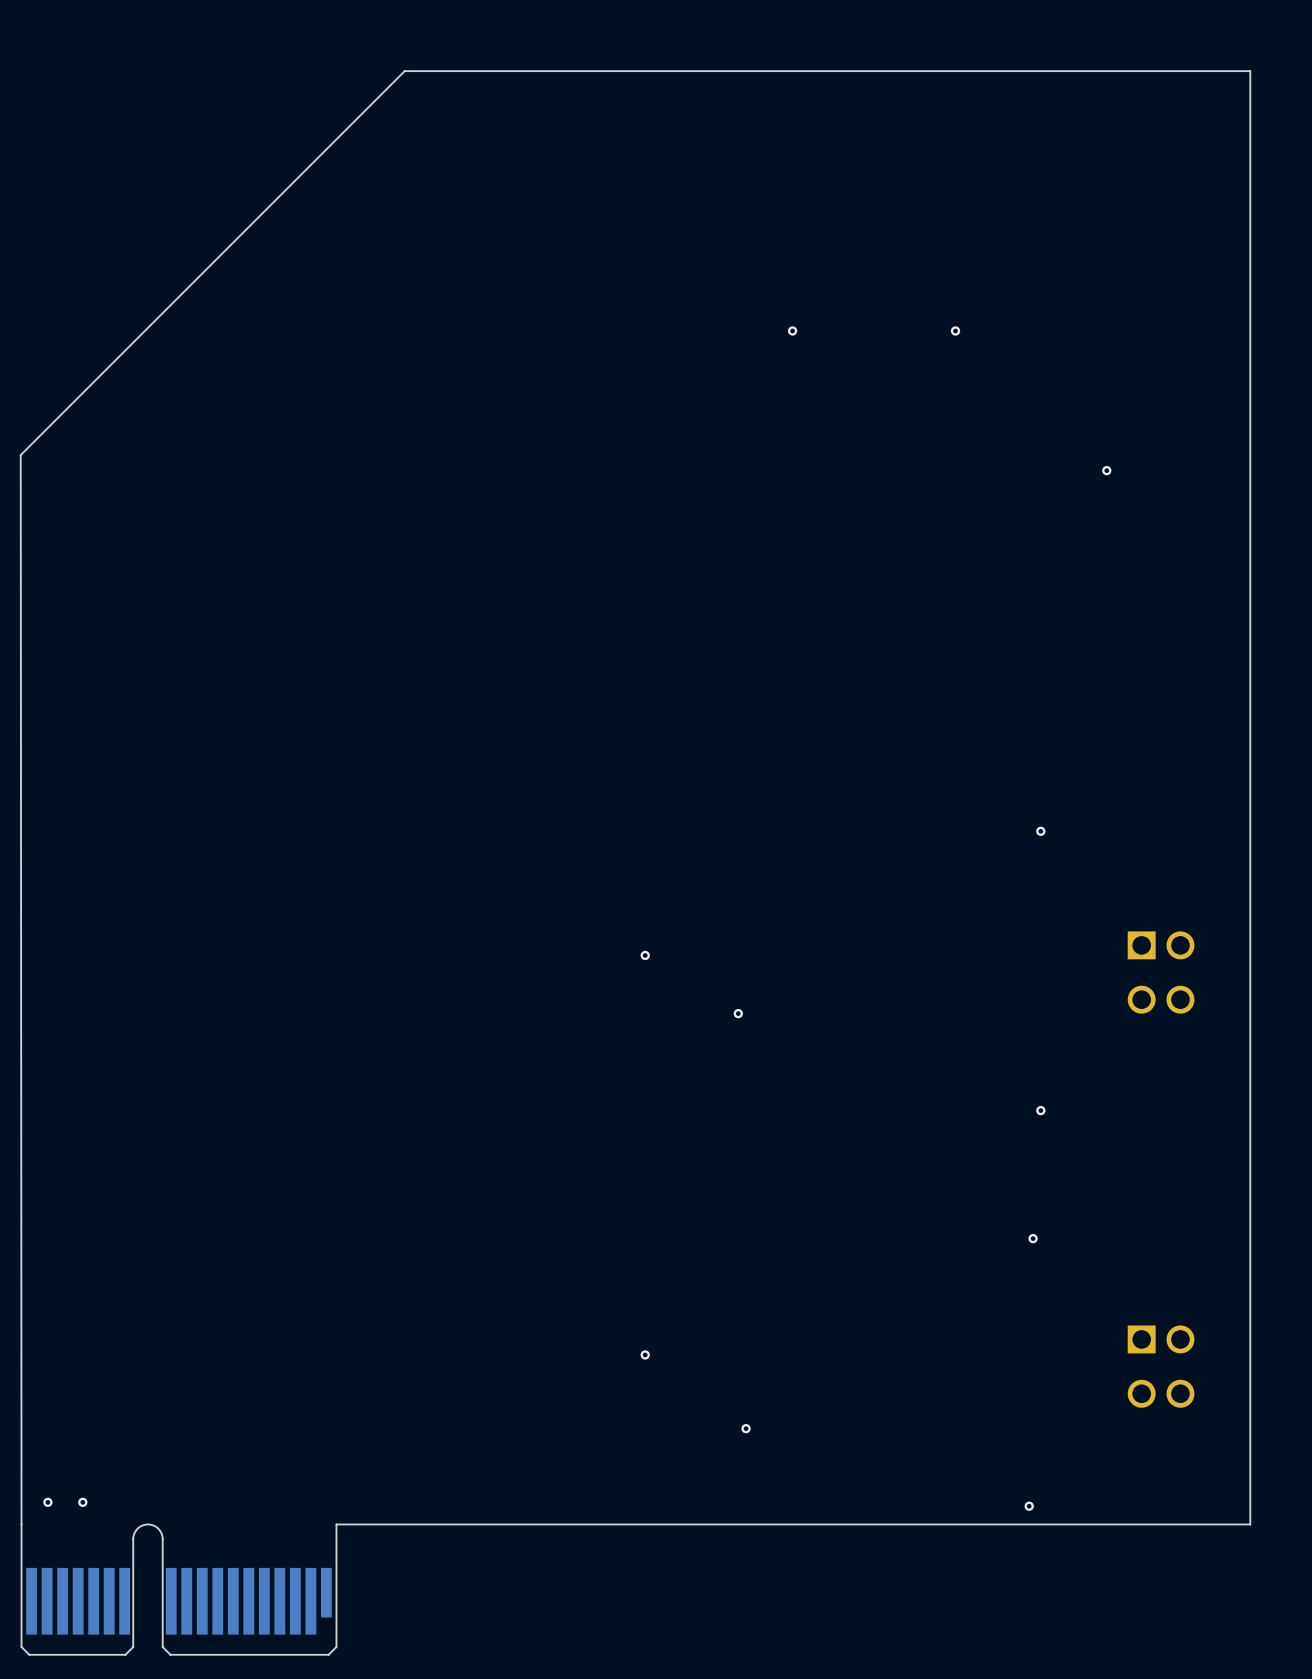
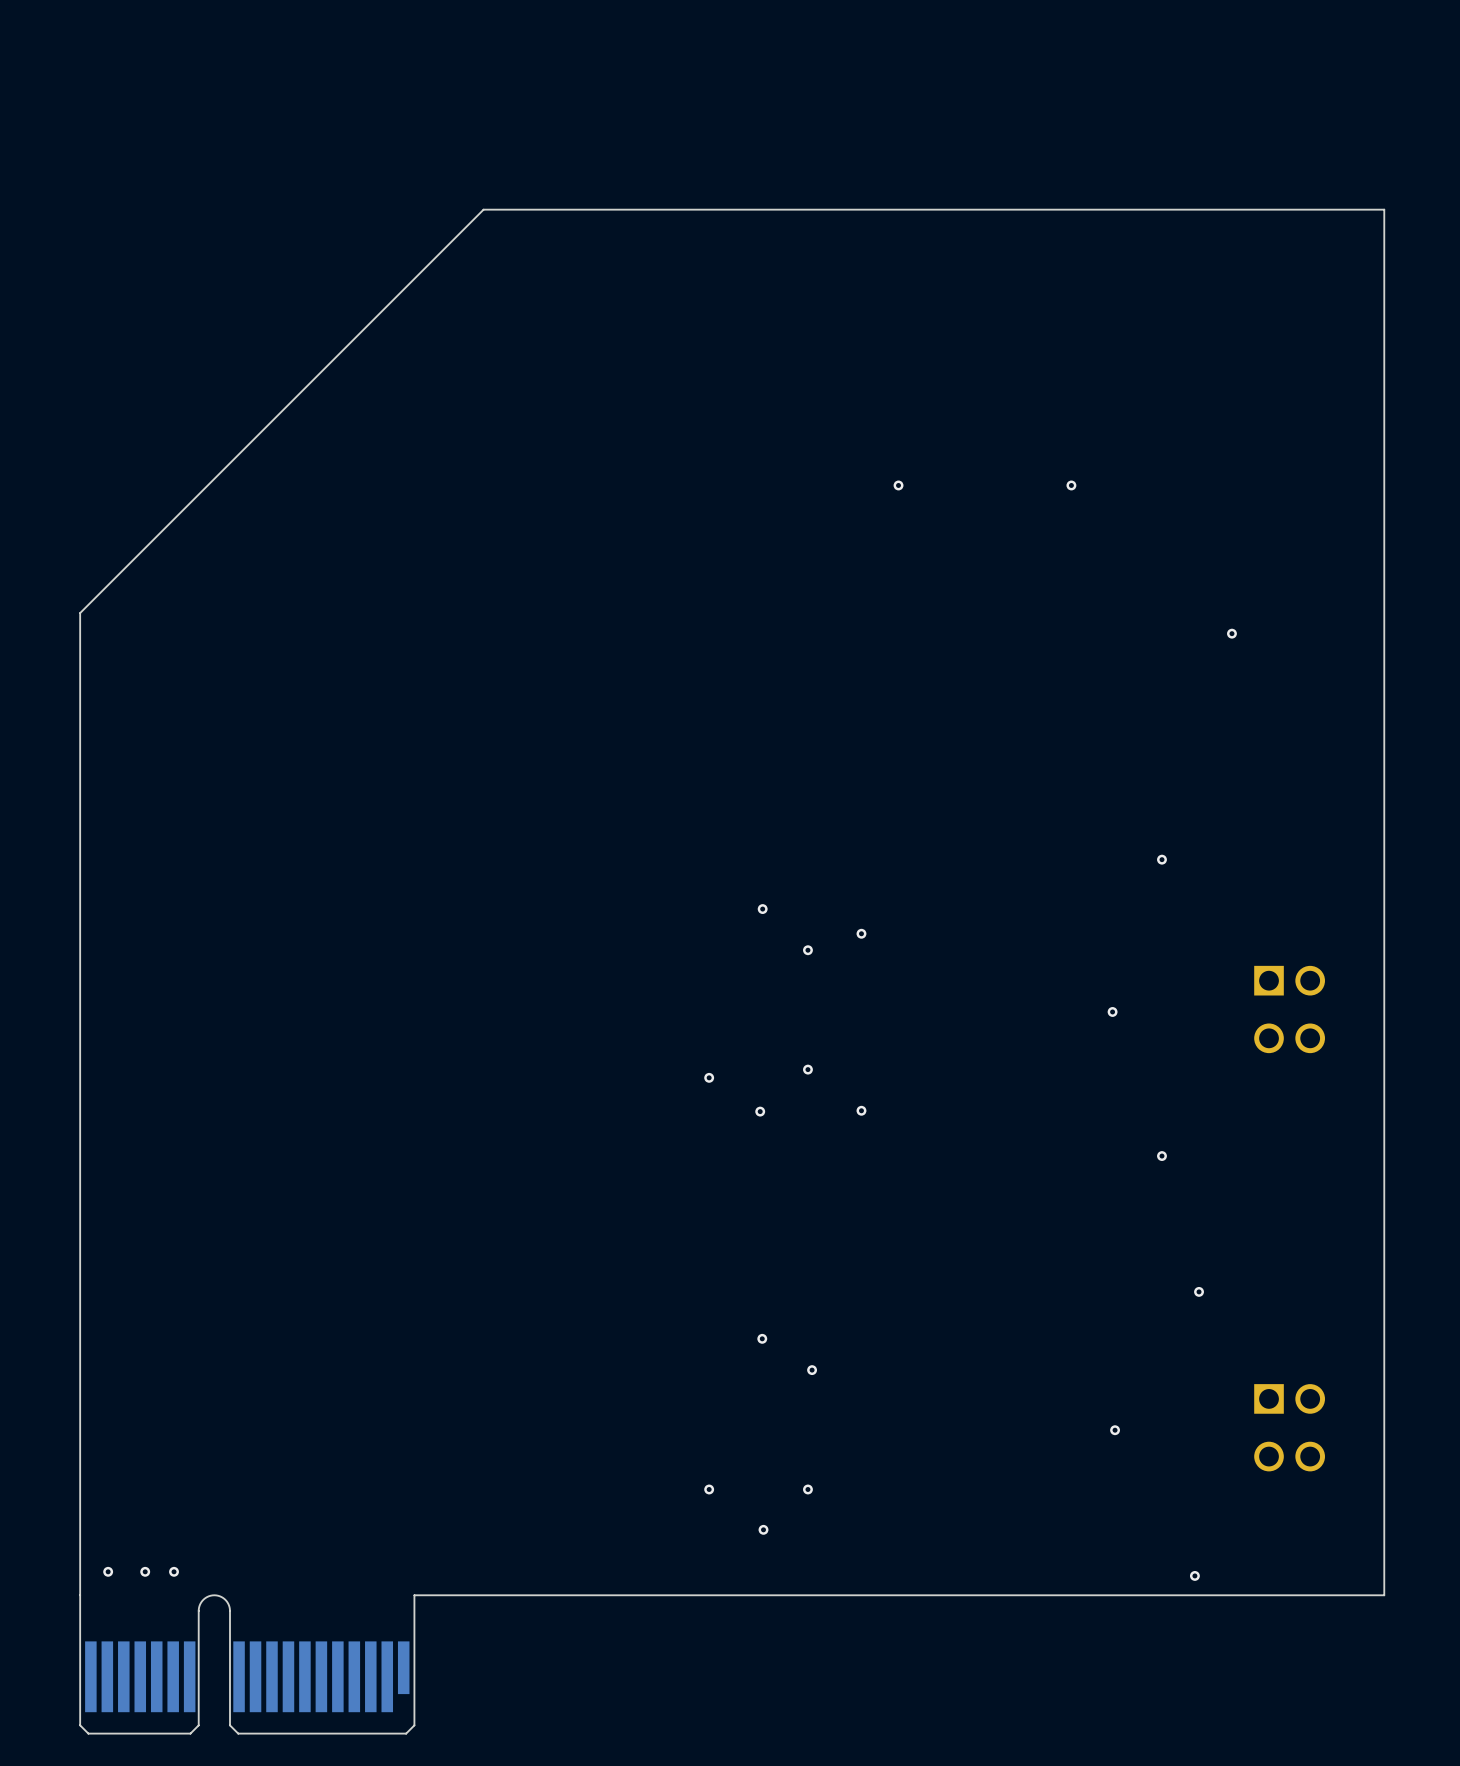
board edge: (1250, 218) (1250, 71) (404, 71) (20, 455) (21, 1524) -> (1384, 209) (483, 209) (80, 613) (80, 1595)
via: (792, 330) -> none
via: (955, 330) -> none
via: (1106, 470) -> none
via: none -> (898, 485)
via: none -> (1071, 485)
via: none -> (1231, 633)
via: none -> (762, 909)
via: none -> (861, 933)
via: none -> (807, 950)
via: (645, 955) -> none
via: none -> (1112, 1011)
via: (738, 1013) -> none
via: none -> (807, 1069)
via: none -> (709, 1077)
via: none -> (861, 1110)
via: none -> (760, 1111)
via position: (1033, 1238) -> (1199, 1291)
via: none -> (762, 1338)
via: none -> (812, 1370)
via: (645, 1354) -> none
via: none -> (1115, 1430)
via: none -> (709, 1489)
via position: (746, 1428) -> (807, 1489)
via: none -> (763, 1529)
via: none -> (174, 1571)
via position: (1029, 1506) -> (1194, 1575)

